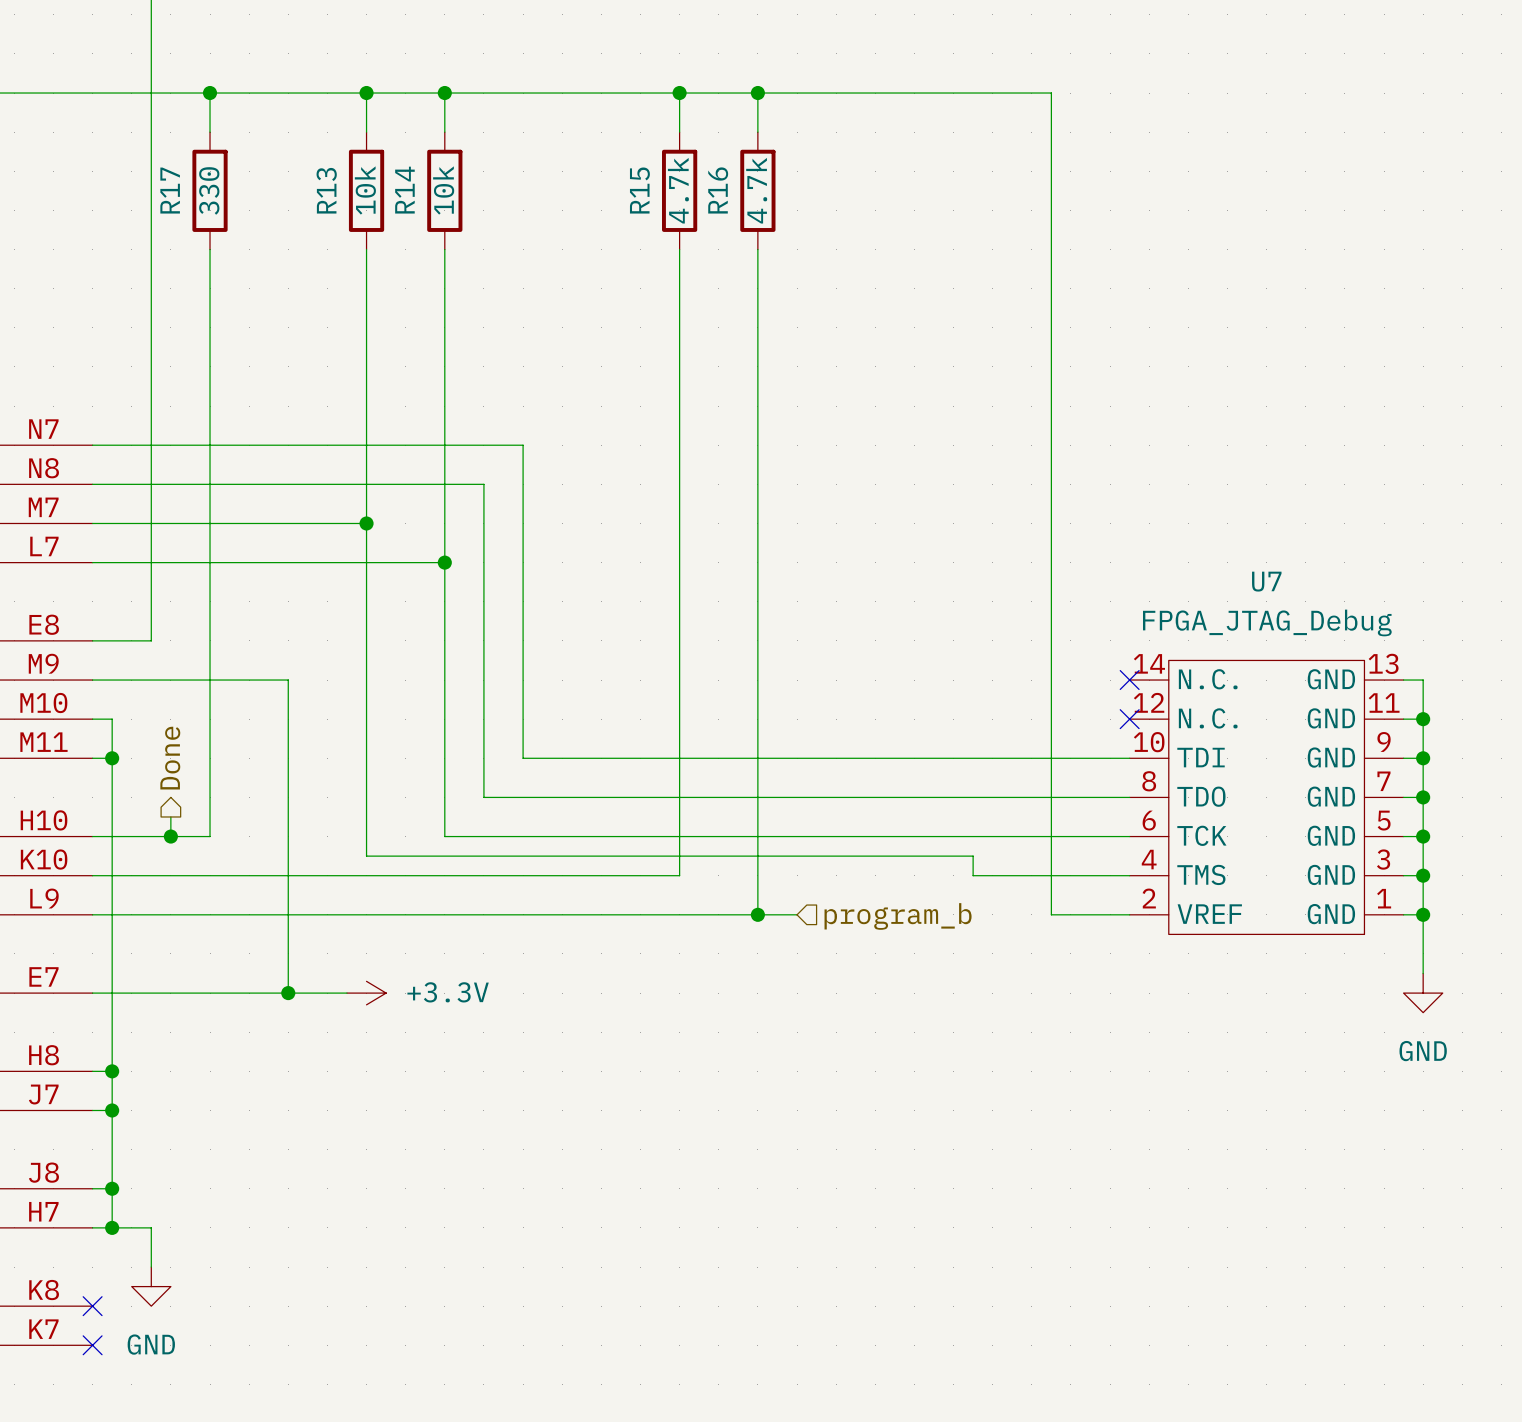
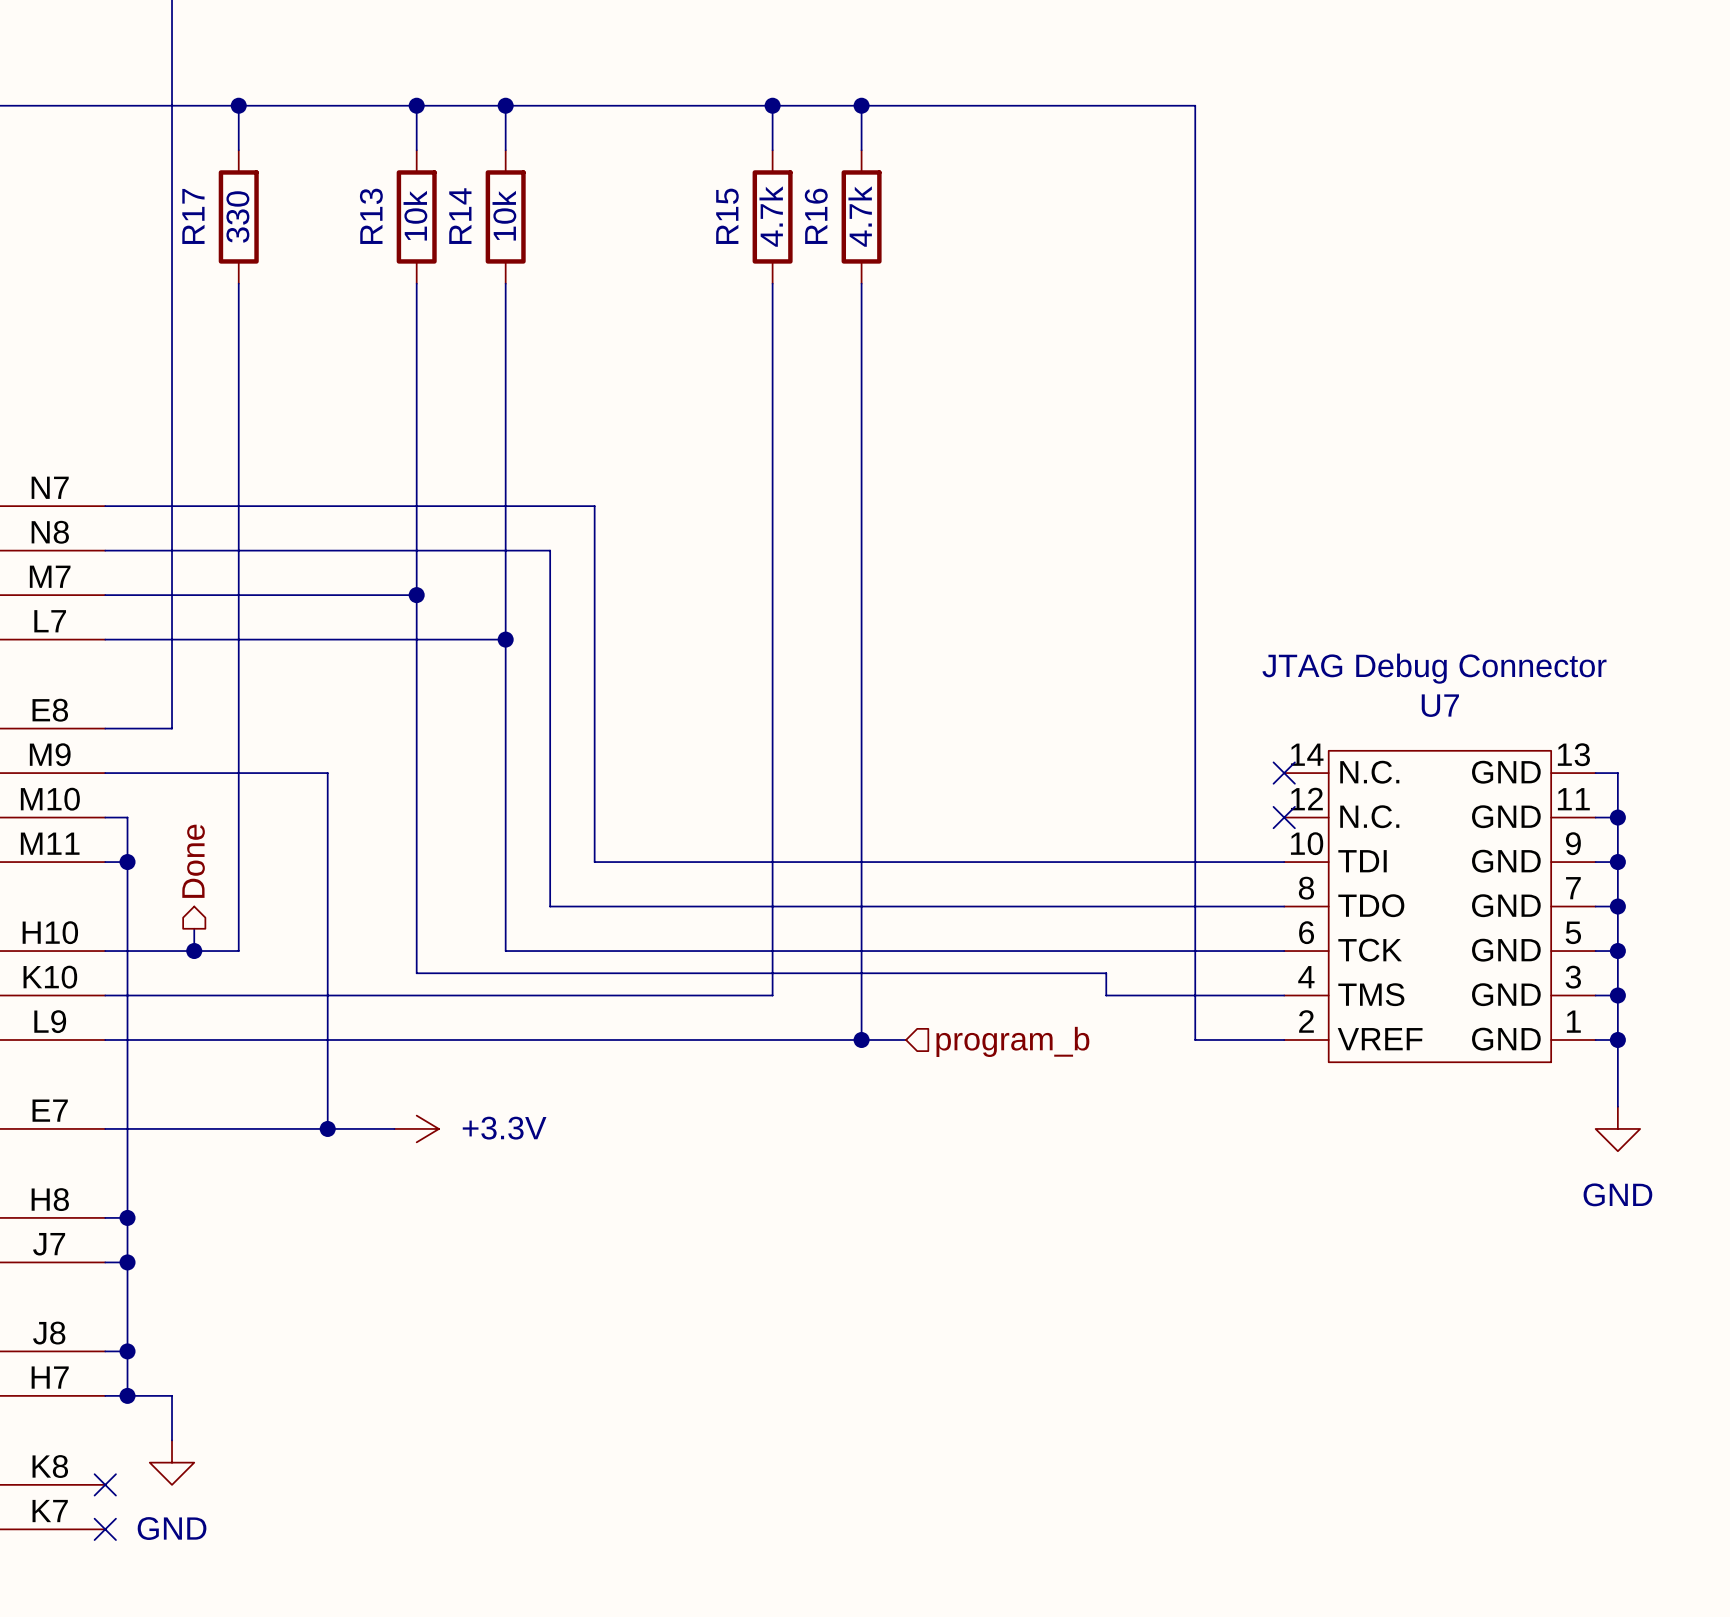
U7 name position: U7 (1266, 581) -> U7 (1440, 705)
text: none -> JTAG Debug Connector (1434, 668)
U7 value: FPGA_JTAG_Debug (1267, 622) -> none

